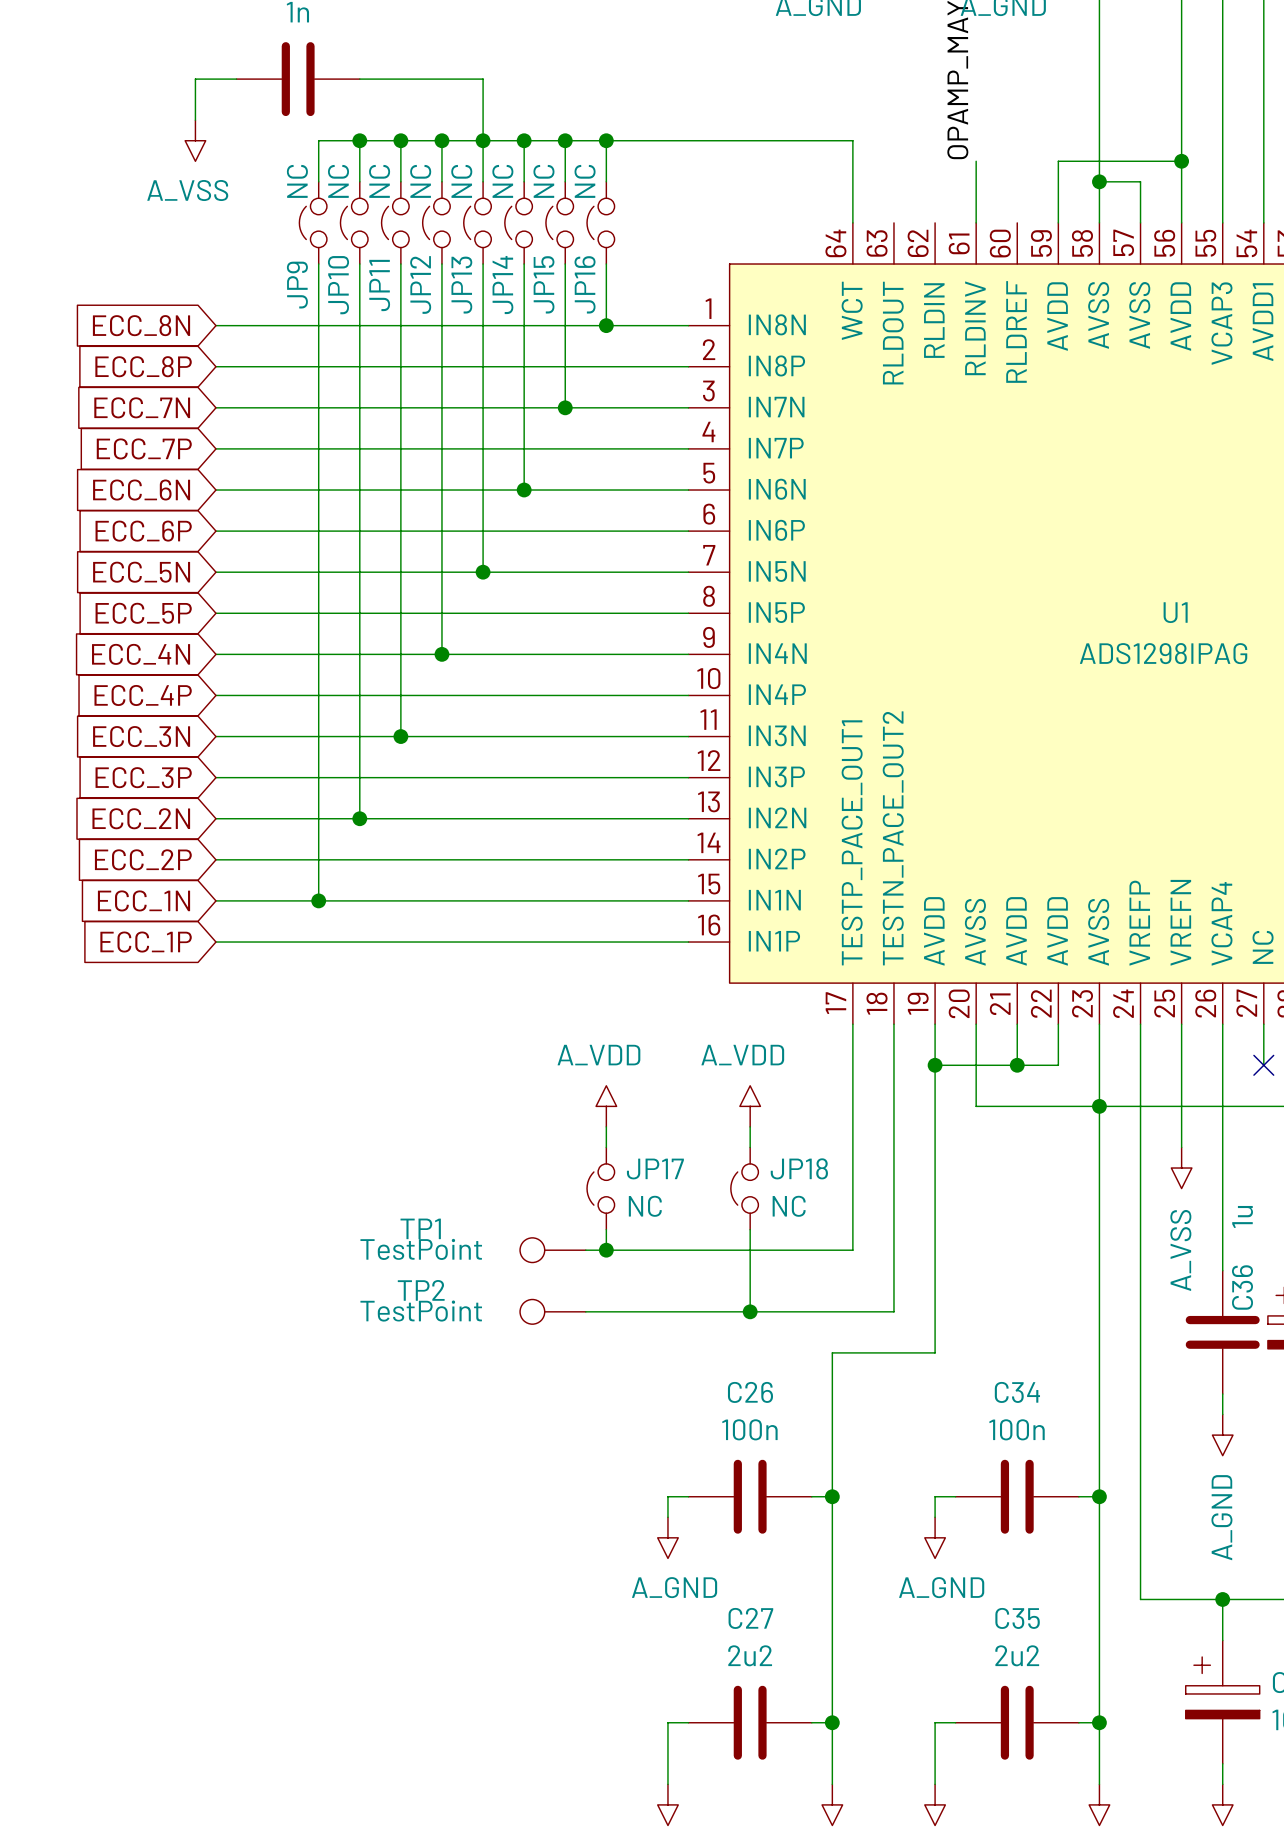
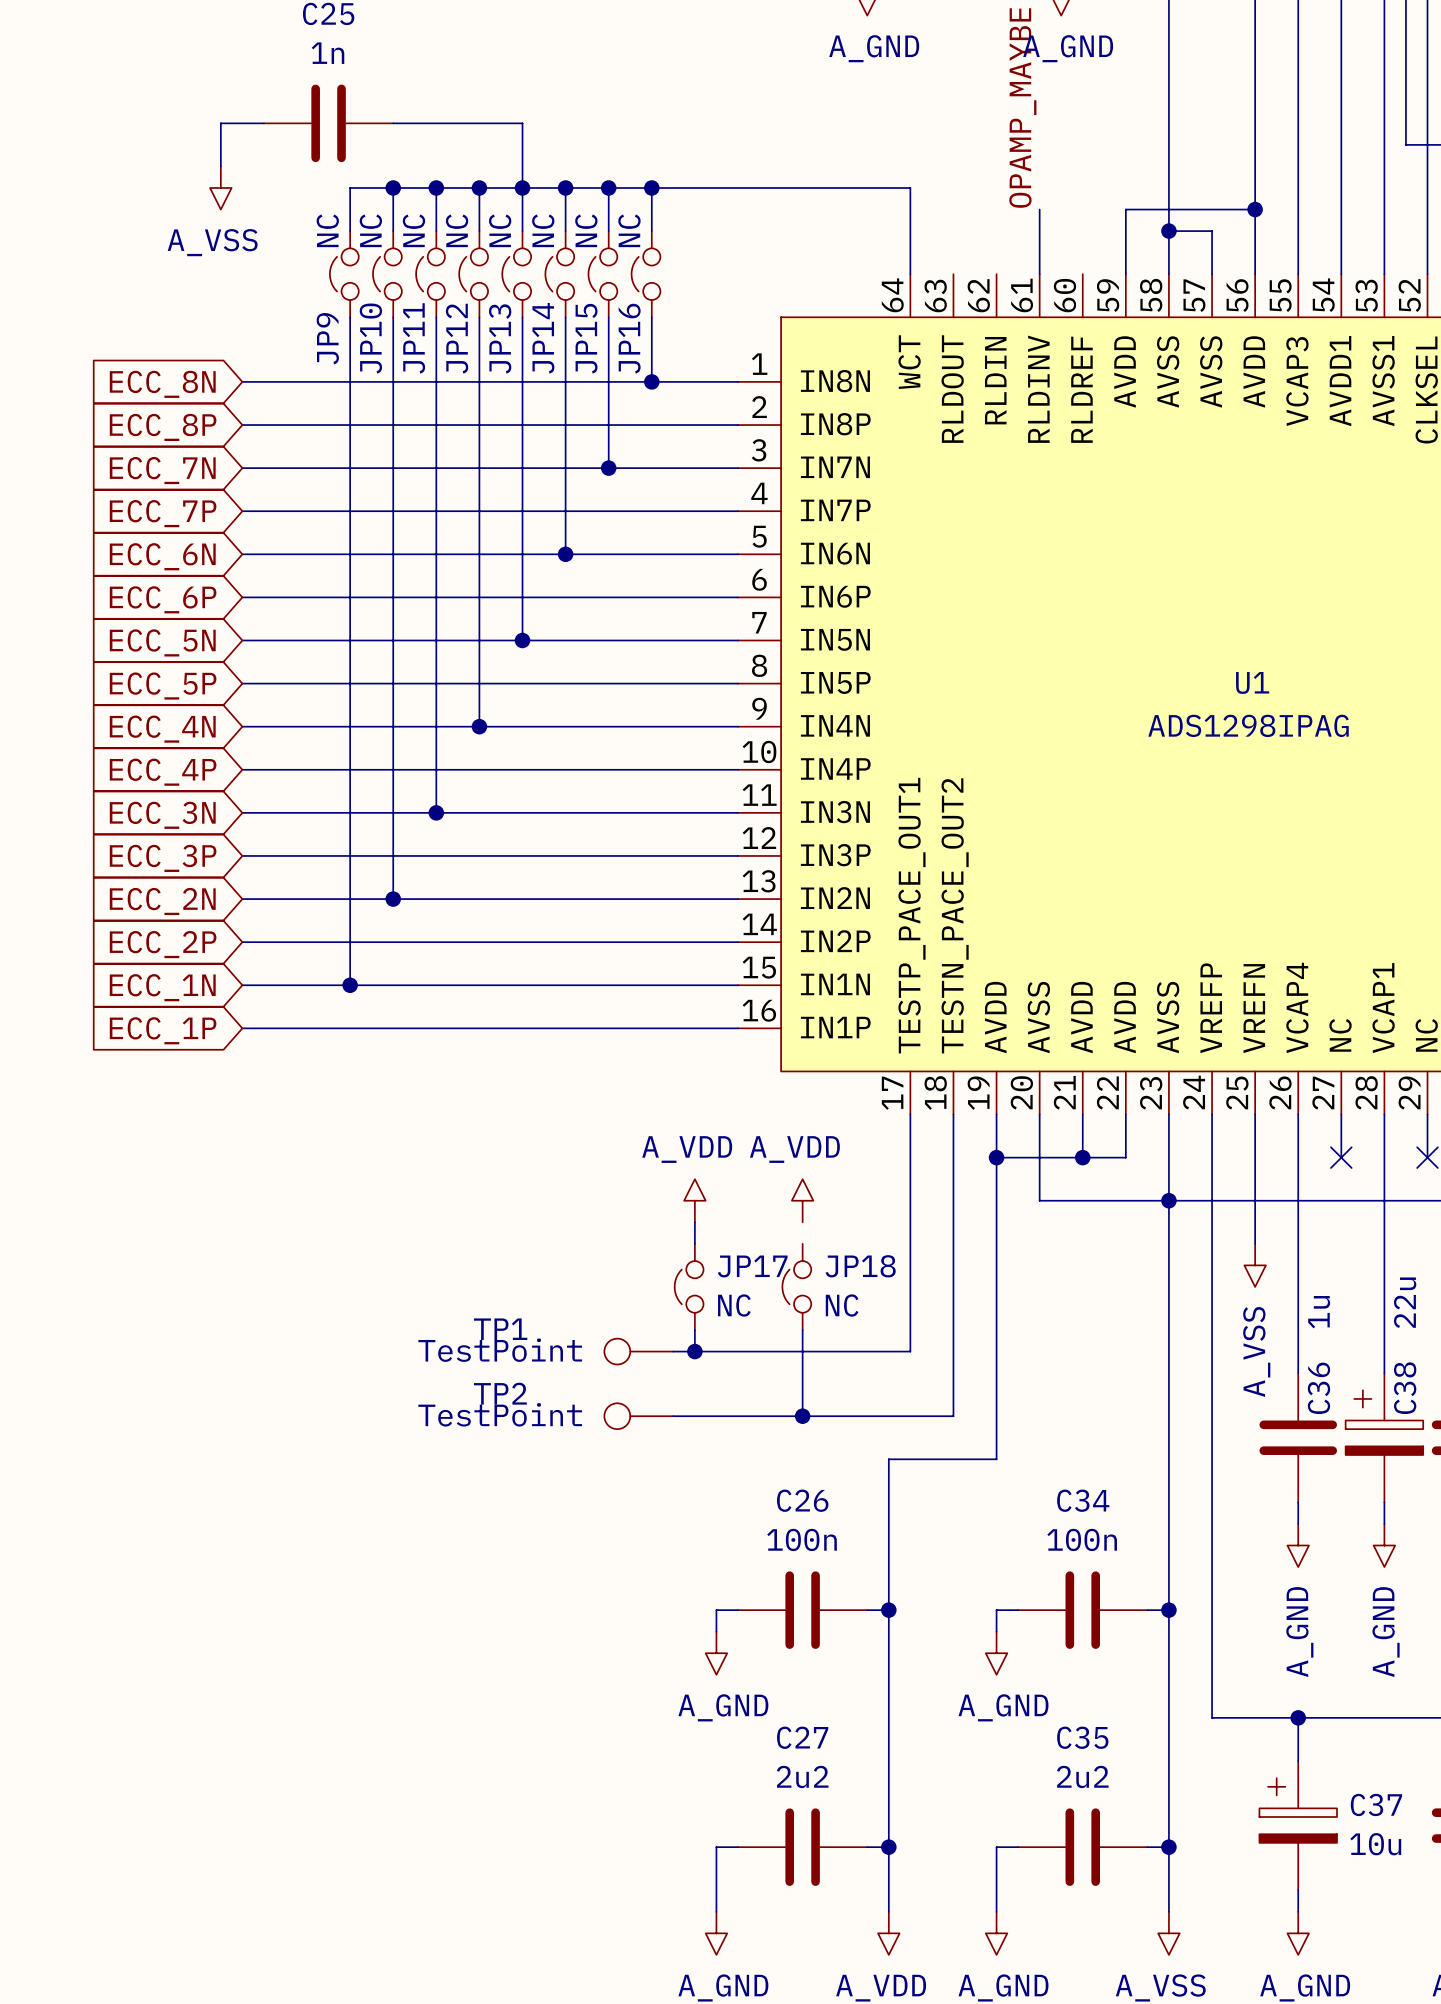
power symbol position: A_VDD (606, 1106) -> A_VDD (694, 1200)
wire: (606, 1126) (606, 1147) -> (694, 1222) (694, 1243)
wire: (750, 1126) (750, 1147) -> none
JP17 position: (600, 1188) -> (689, 1286)
wire: (606, 1229) (606, 1250) -> (694, 1330) (694, 1351)
TP1 position: (552, 1250) -> (638, 1351)
junction position: (606, 1250) -> (694, 1351)
TP2 position: (552, 1311) -> (638, 1416)

